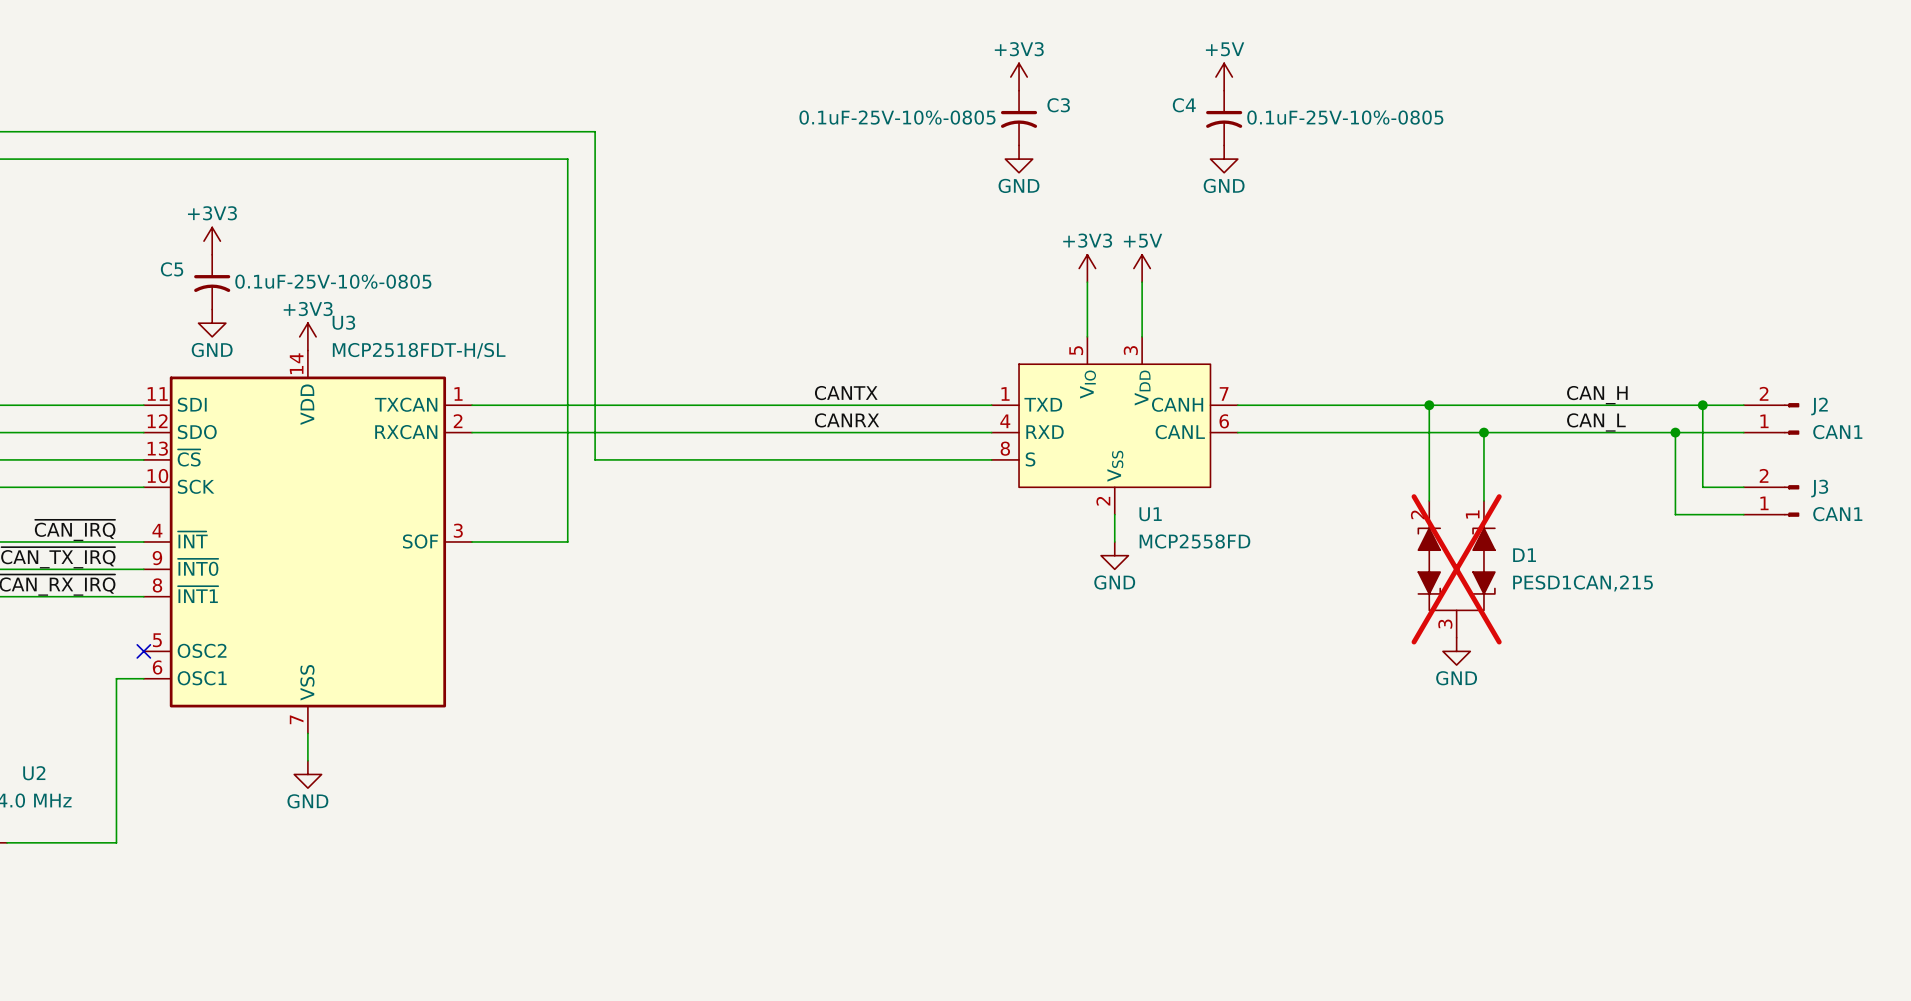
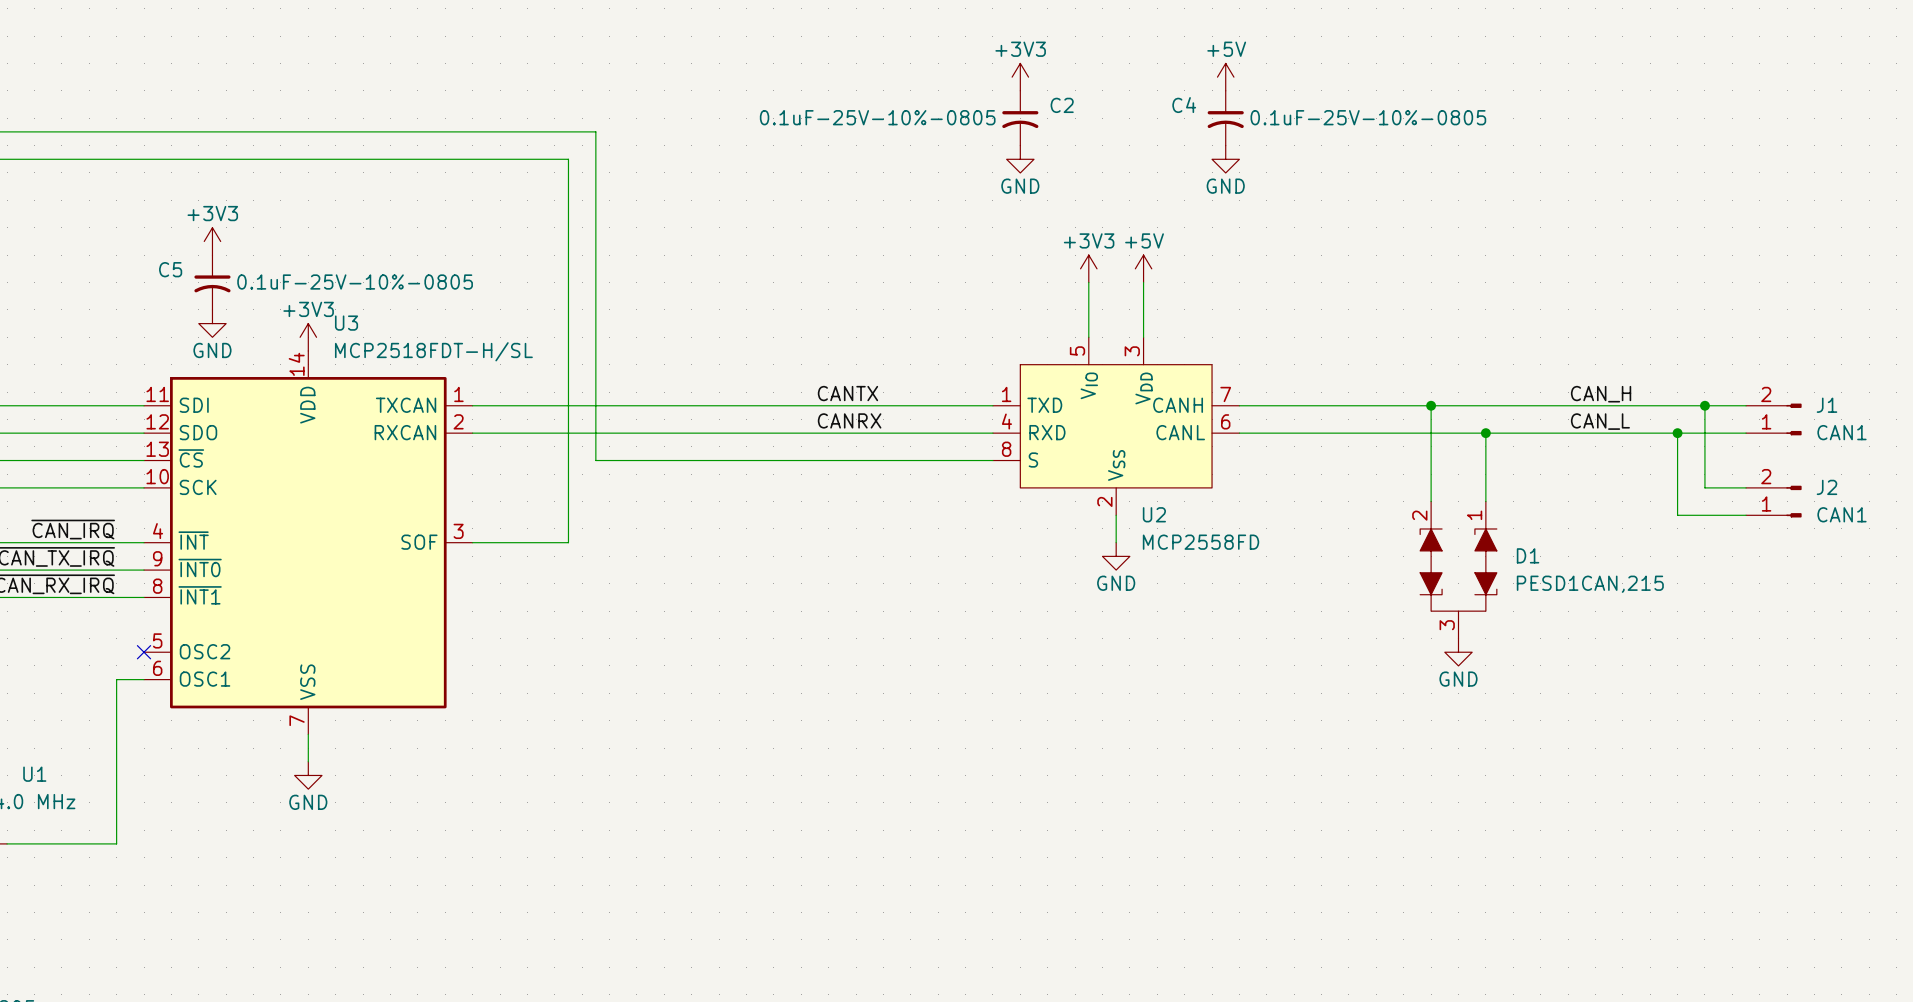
C3 name: C3 (1058, 105) -> C2 (1062, 105)
J2 name: J2 (1819, 406) -> J1 (1826, 405)
J3 name: J3 (1819, 488) -> J2 (1826, 487)
U1 name: U1 (1150, 514) -> U2 (1154, 514)
D1 do-not-place cross: (1456, 569) -> none
U2 name: U2 (34, 773) -> U1 (34, 774)

